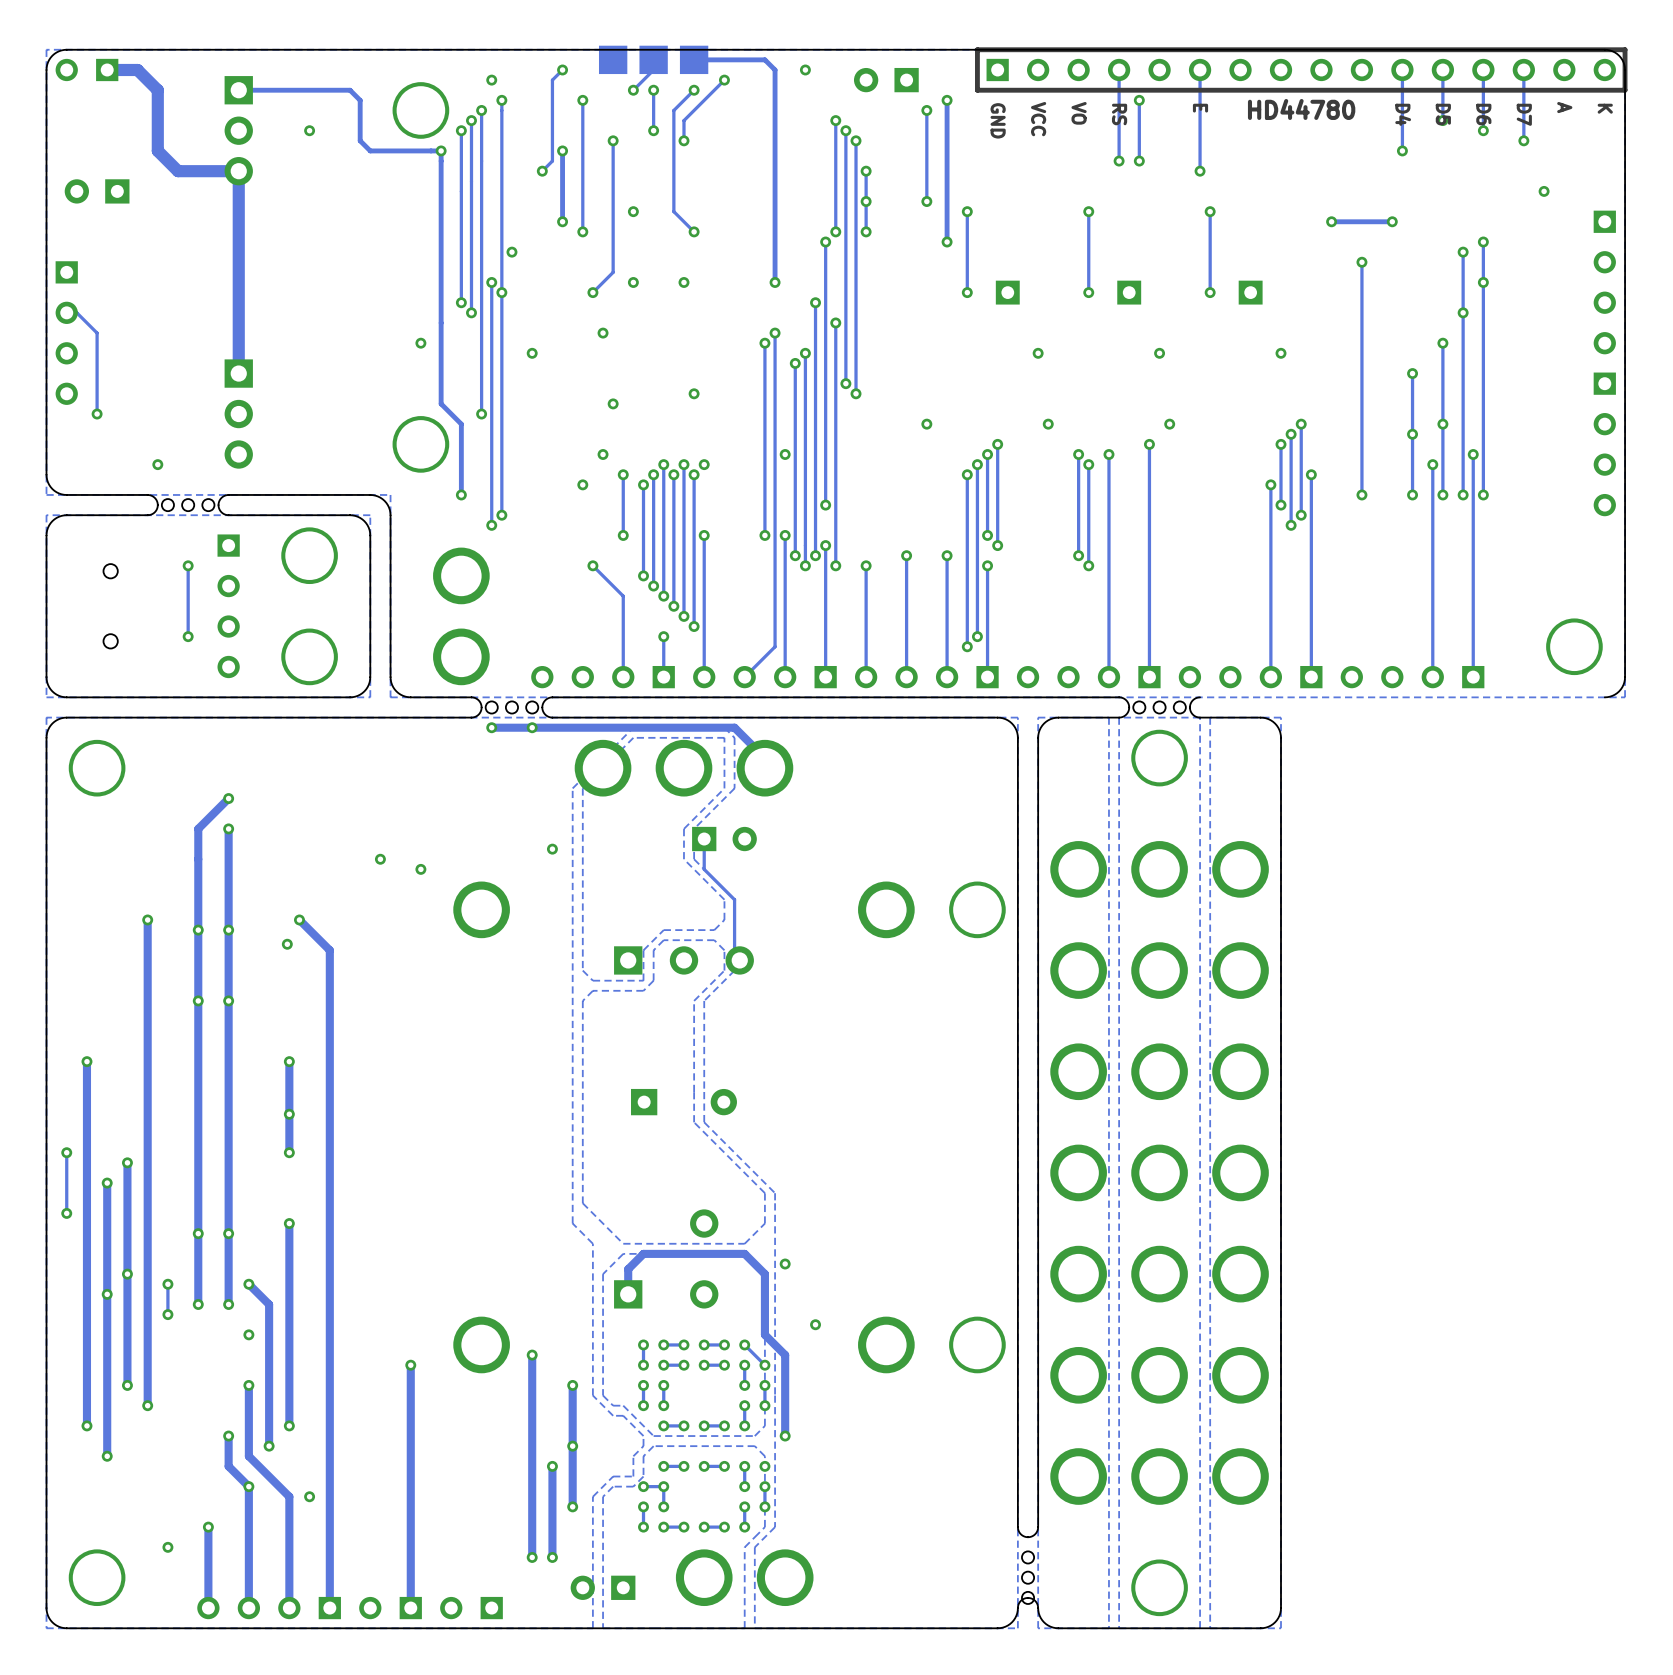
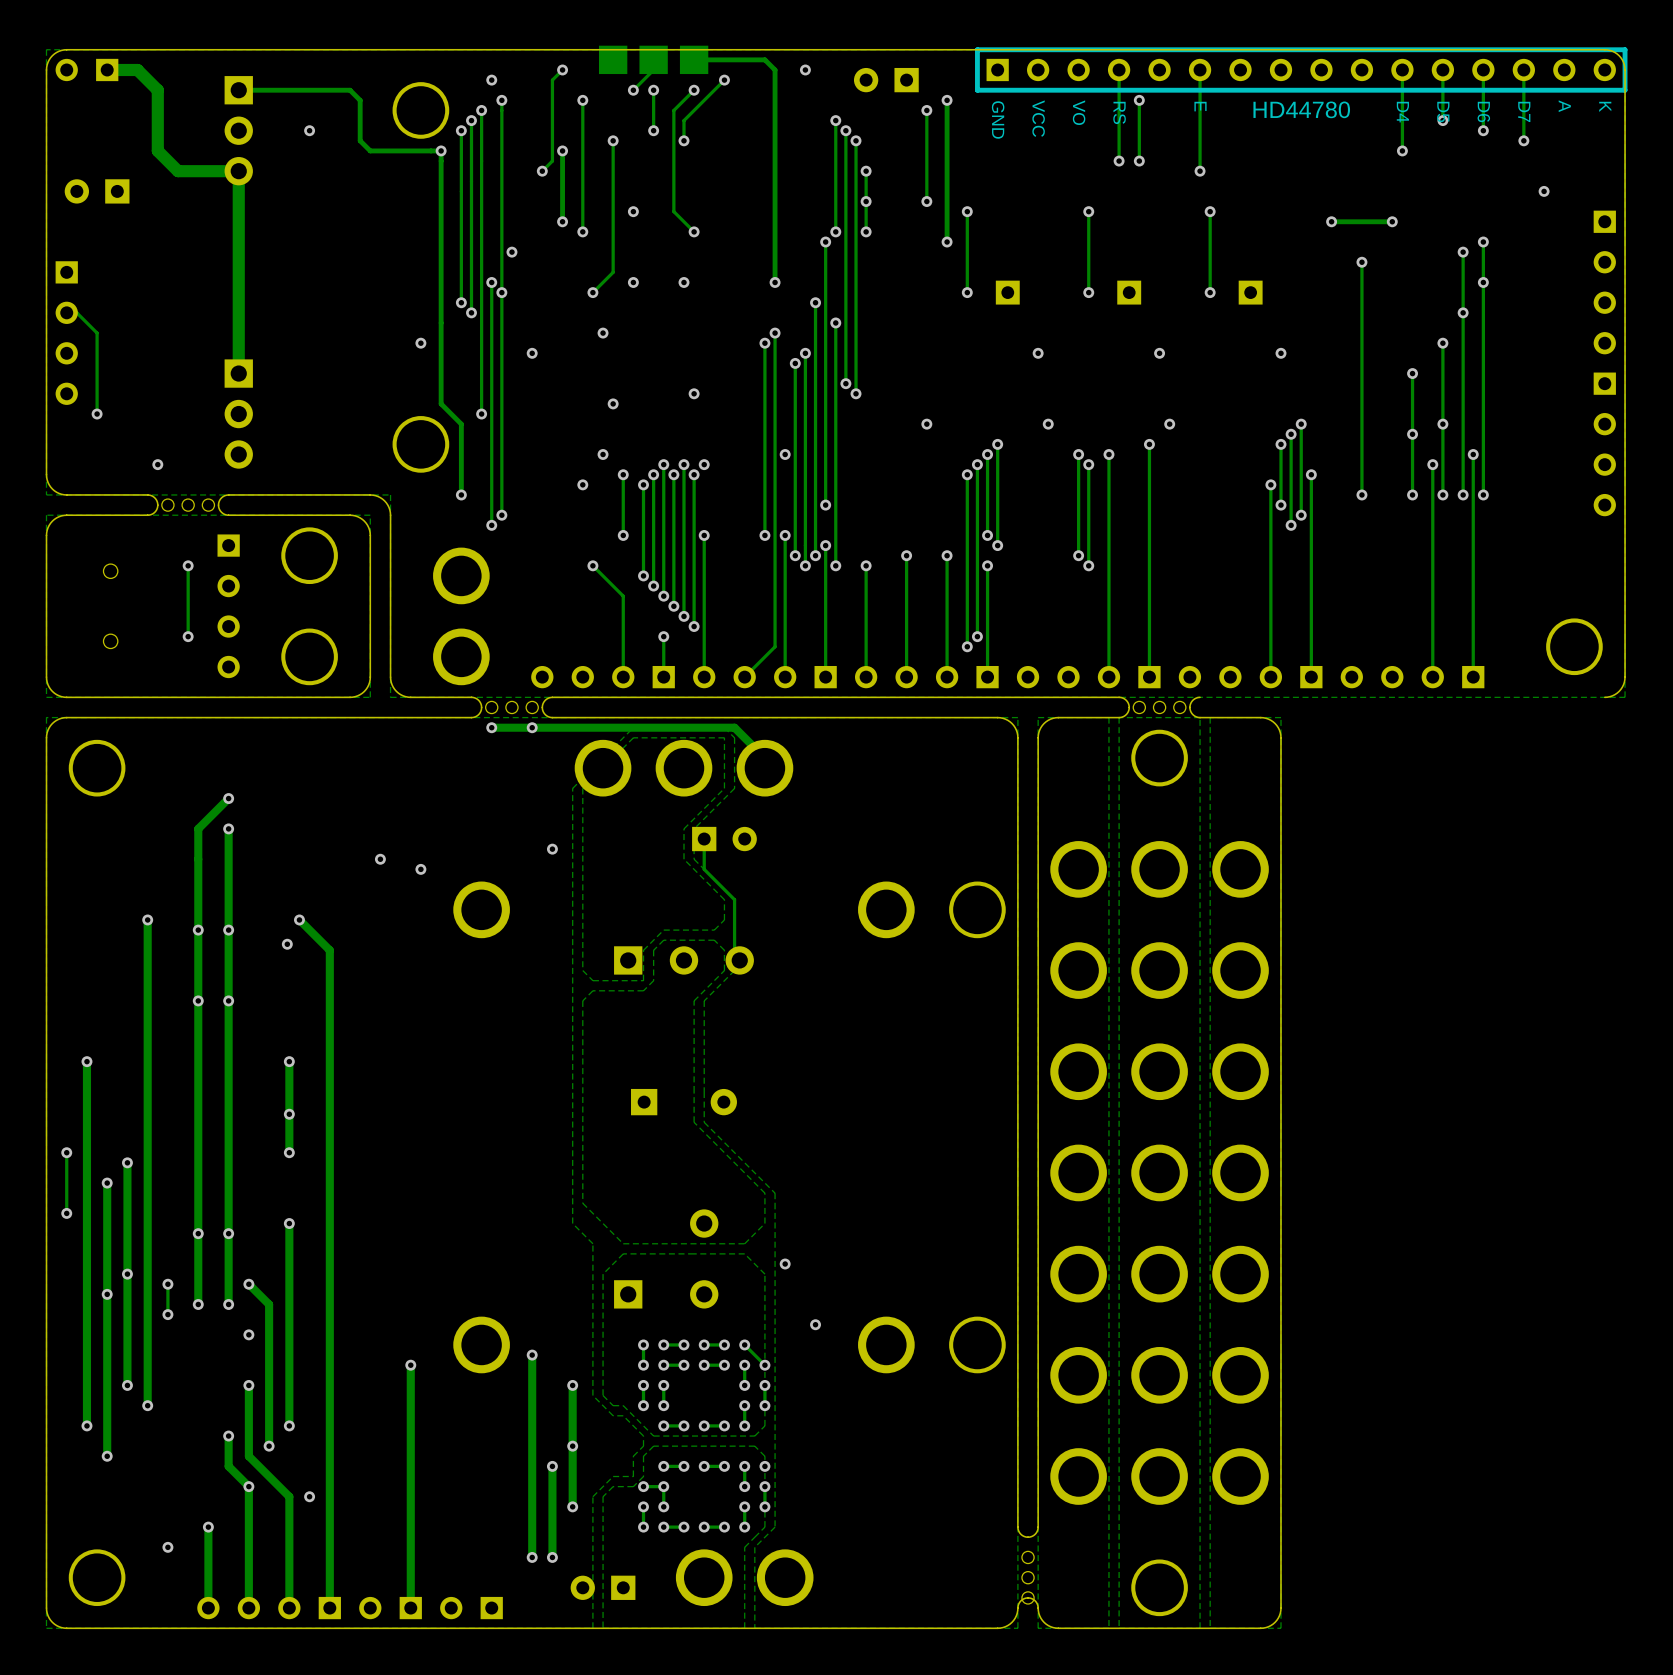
track: (628, 1294) (628, 1269) (643, 1253) (744, 1253) (764, 1274) (764, 1334) (785, 1355) (785, 1436) -> none
via: (785, 1436) -> none

